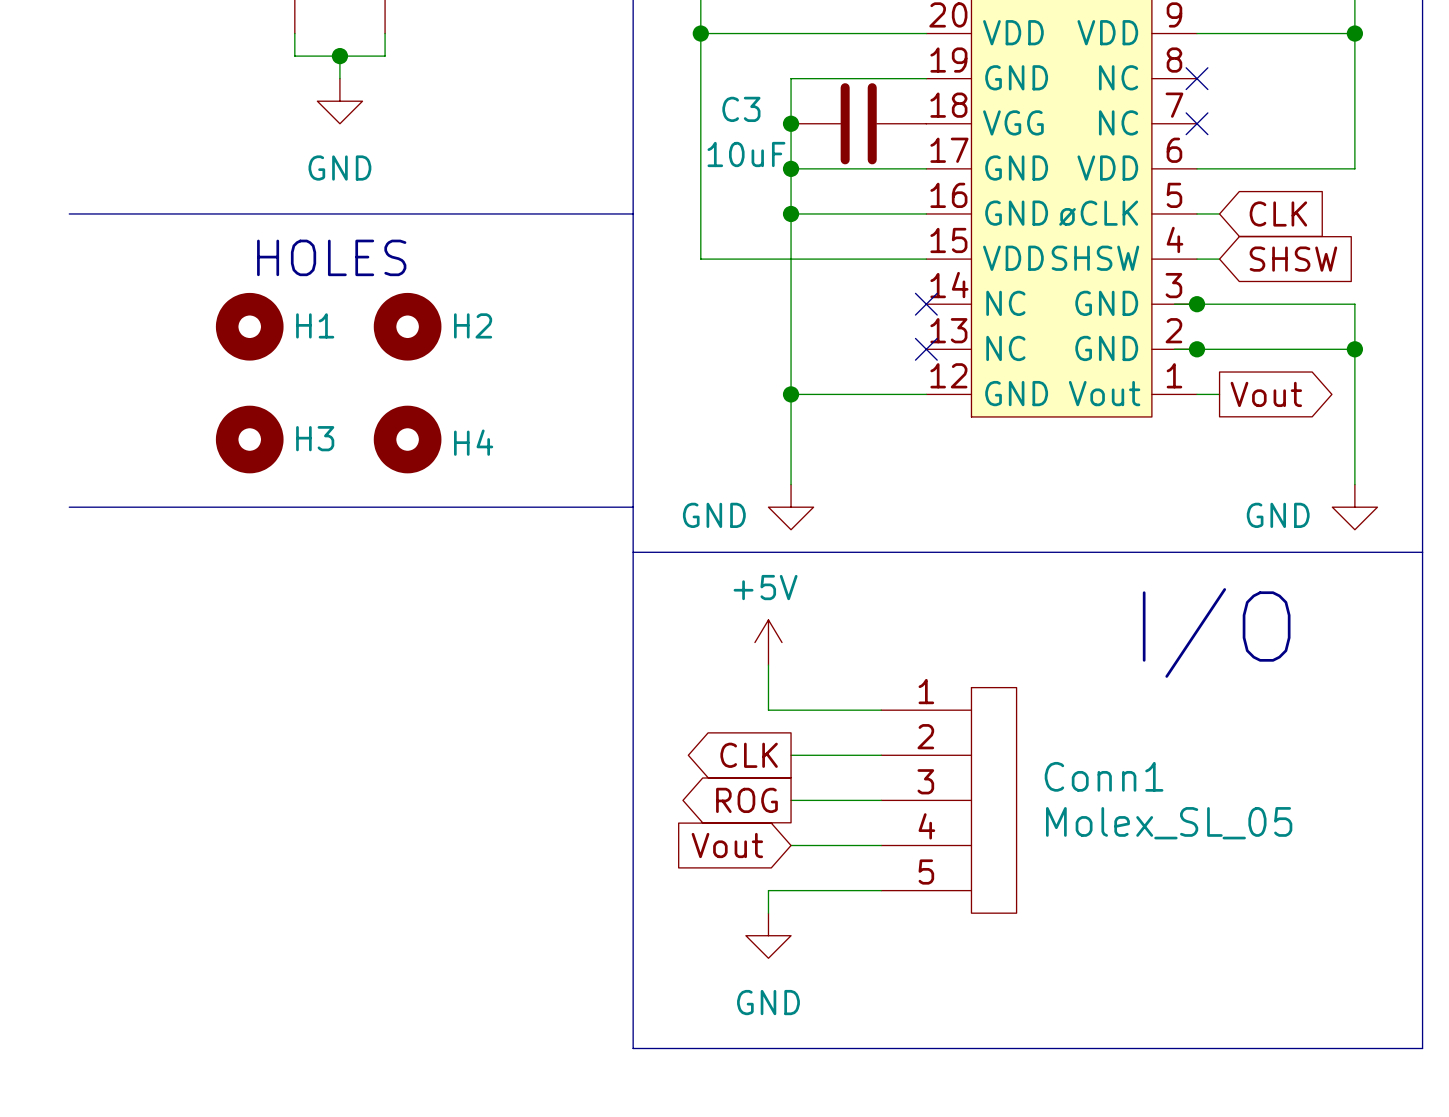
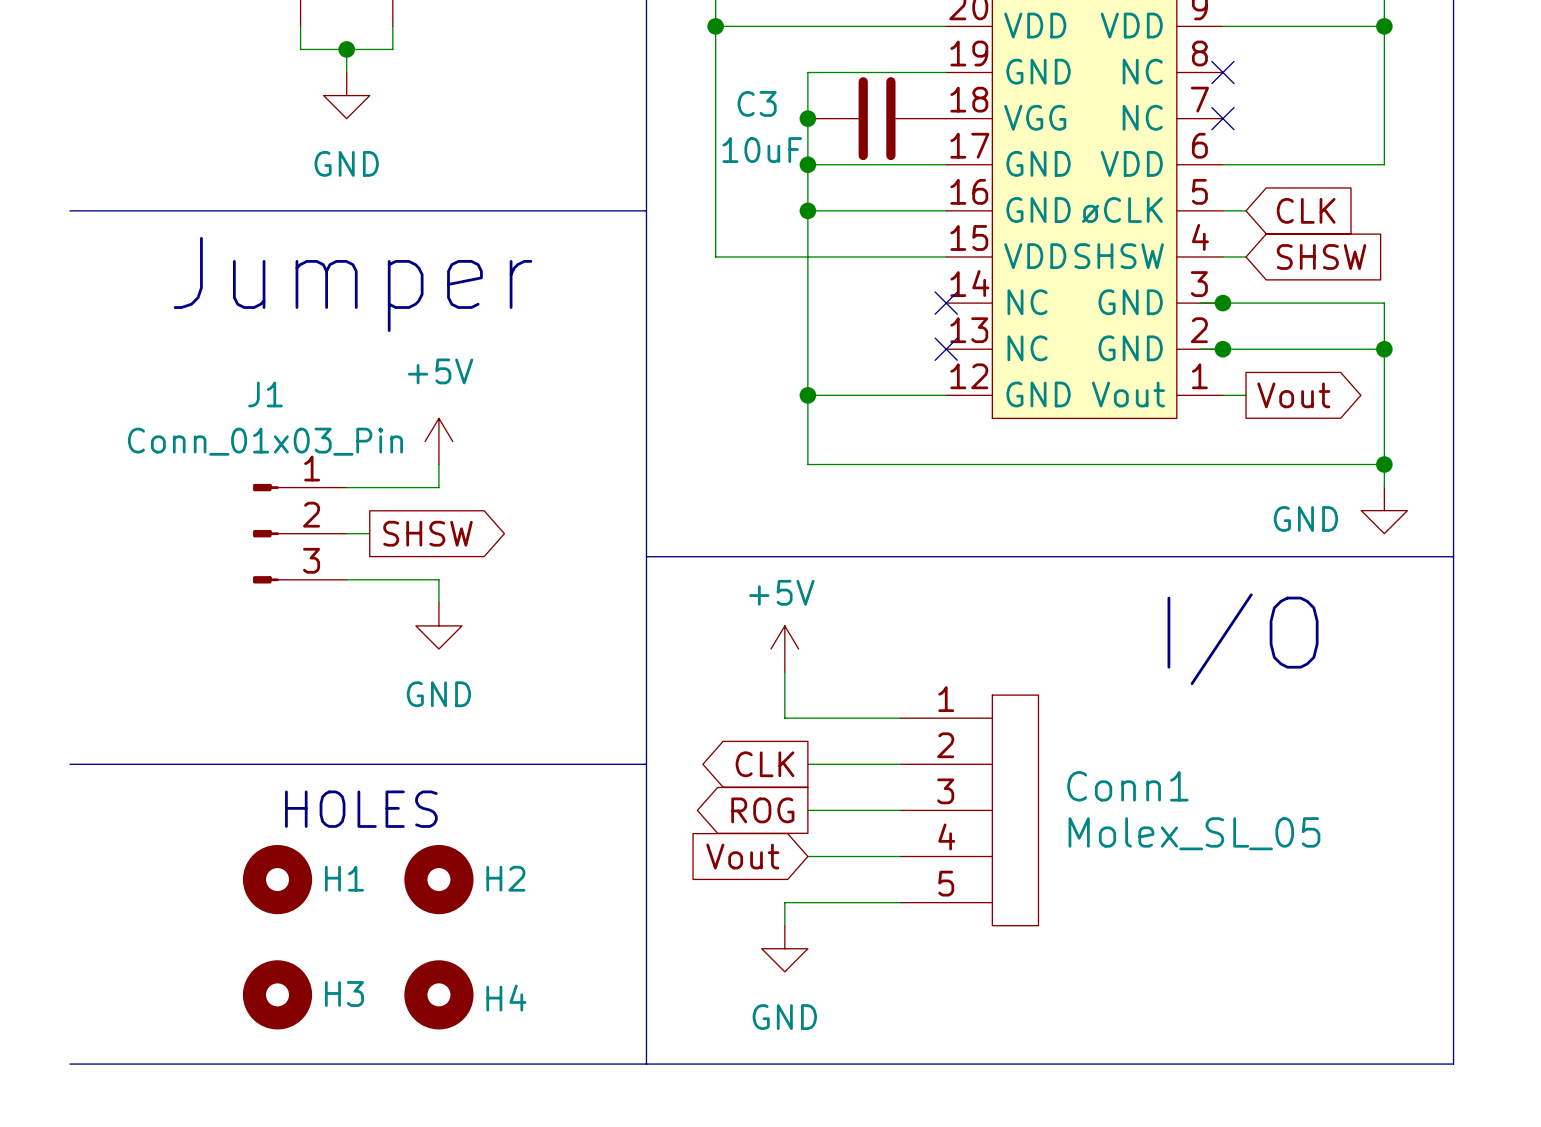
text: HOLES (331, 257) -> none
text: none -> Jumper (352, 284)
H1 position: (249, 326) -> (277, 879)
H2 position: (407, 326) -> (438, 879)
H3 position: (249, 439) -> (277, 994)
H4 position: (407, 439) -> (438, 994)
power symbol: none -> +5V (438, 441)
wire: none -> (438, 464) (438, 487) (346, 487)
wire: (791, 462) (791, 484) -> (807, 464) (1384, 464)
junction: none -> (1384, 464)
line: (69, 507) (633, 507) -> (69, 764) (646, 764)
power symbol position: GND (791, 507) -> GND (438, 625)
power symbol text position: GND (714, 515) -> GND (438, 694)
J1: none -> Conn_01x03_Pin (299, 533)
wire: none -> (346, 533) (369, 533)
global label: none -> SHSW (427, 533)
wire: none -> (346, 579) (438, 579) (438, 602)
text: none -> HOLES (361, 809)
line: none -> (69, 1064) (646, 1064)

